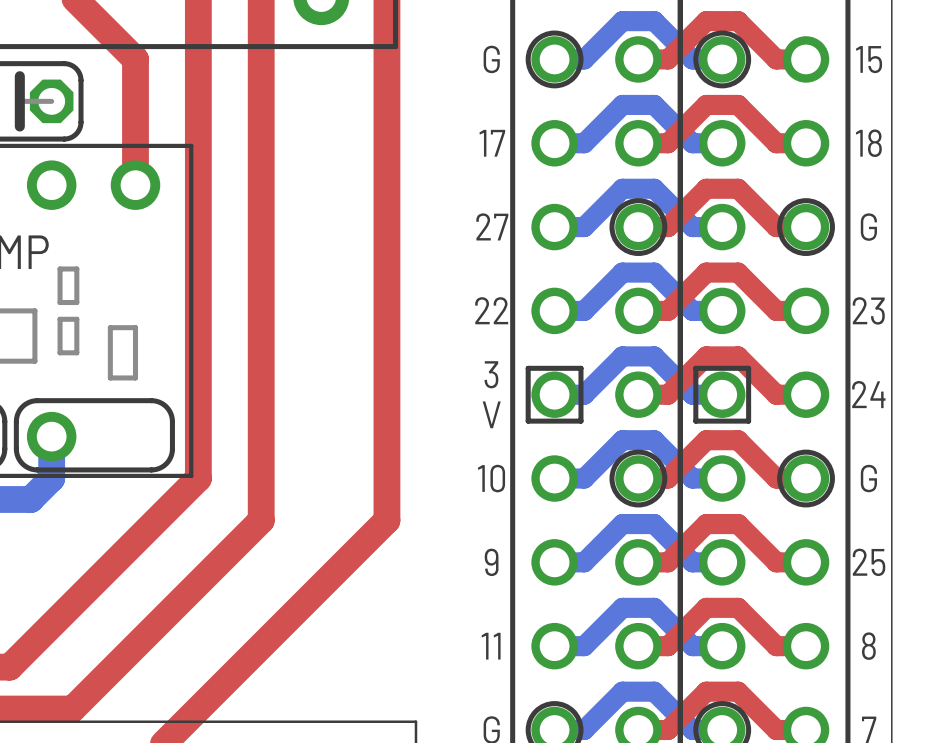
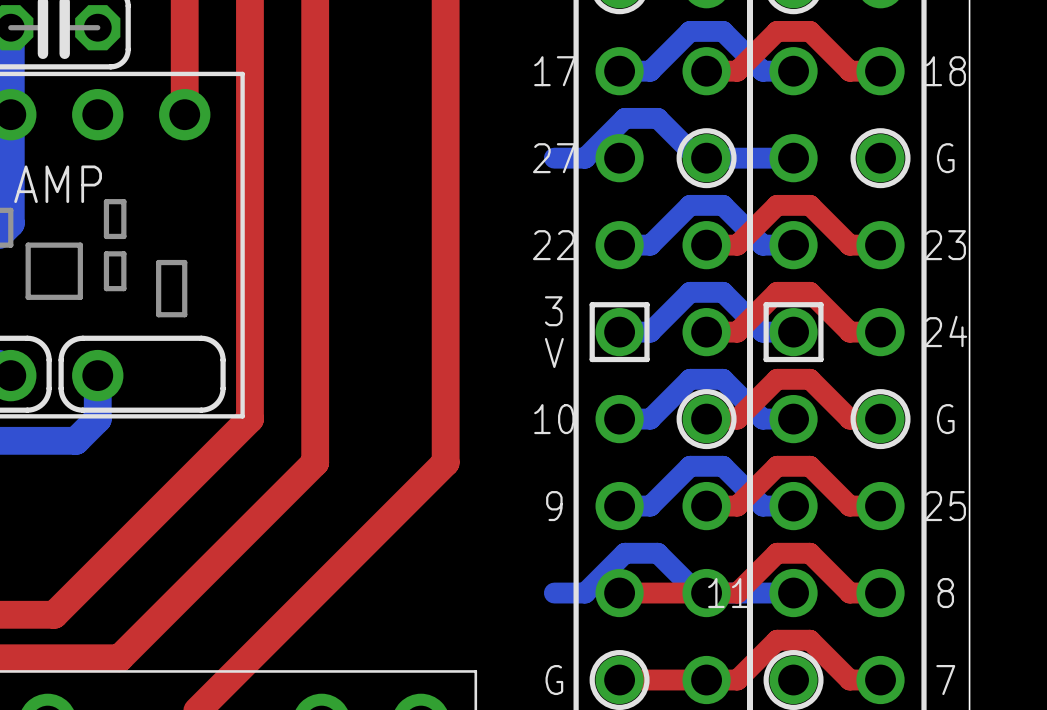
bottom track: (554, 227) (584, 227) (622, 188) (654, 188) (692, 227) -> (554, 158) (585, 158) (624, 118) (657, 118) (697, 158) (762, 158)
top track: (638, 227) (668, 227) (706, 188) (738, 188) (776, 227) (806, 227) -> none
text position: 11 (491, 646) -> 11 (728, 593)
bottom track: (554, 646) (584, 646) (622, 607) (654, 607) (692, 646) -> (554, 593) (585, 593) (624, 553) (657, 553) (697, 593) (762, 593)
top track: none -> (641, 593) (706, 593)
bottom track: (554, 729) (584, 729) (622, 691) (654, 691) (692, 729) (722, 729) -> none
top track: none -> (641, 680) (706, 680)

